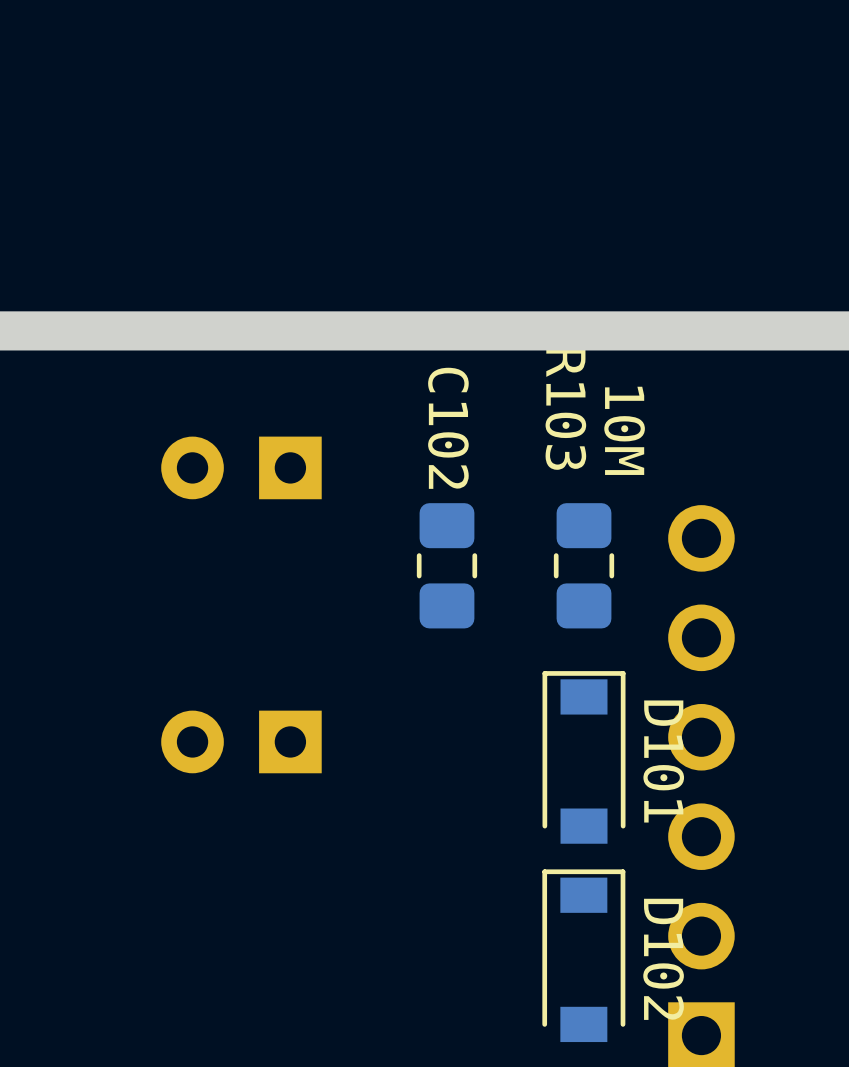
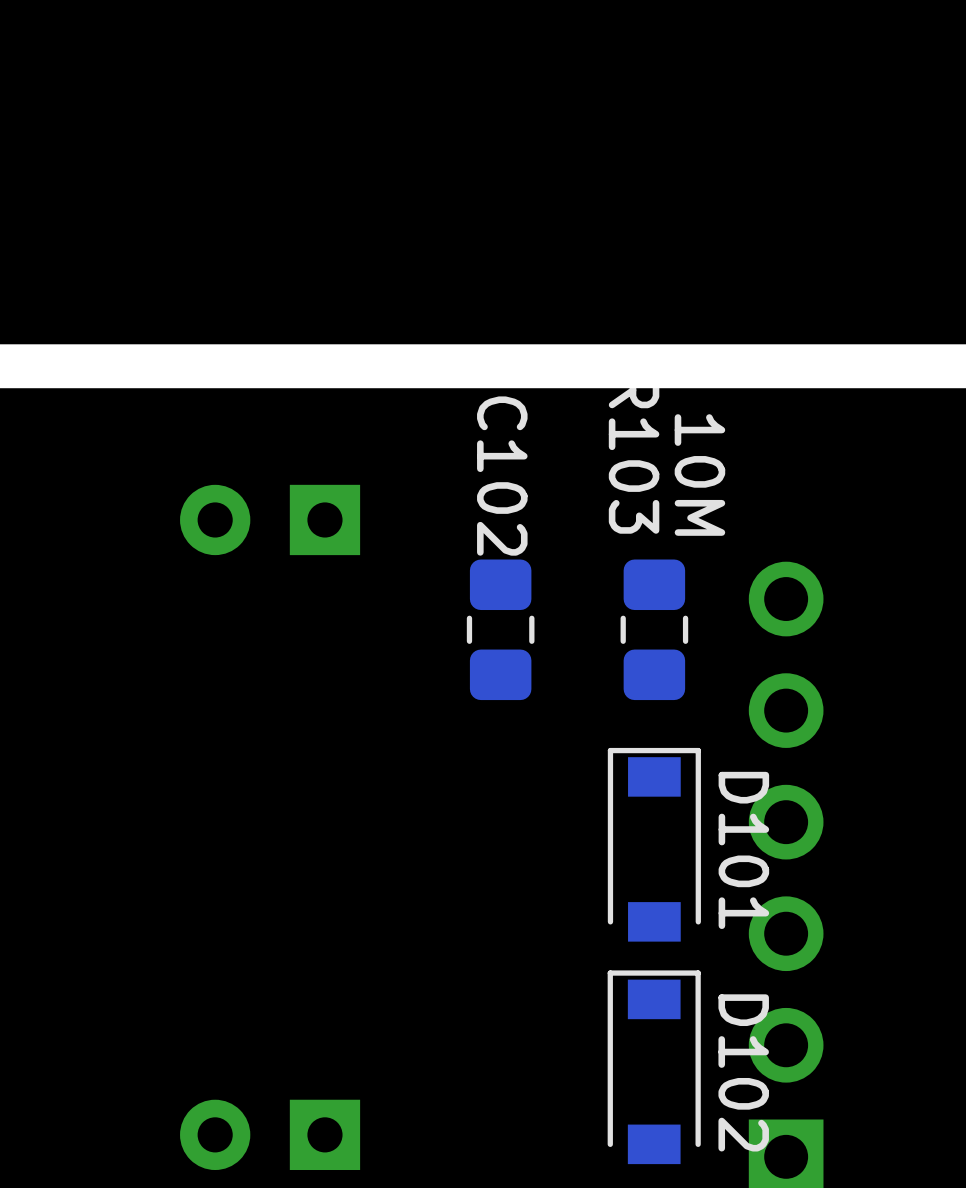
part position: (241, 741) -> (270, 1134)

